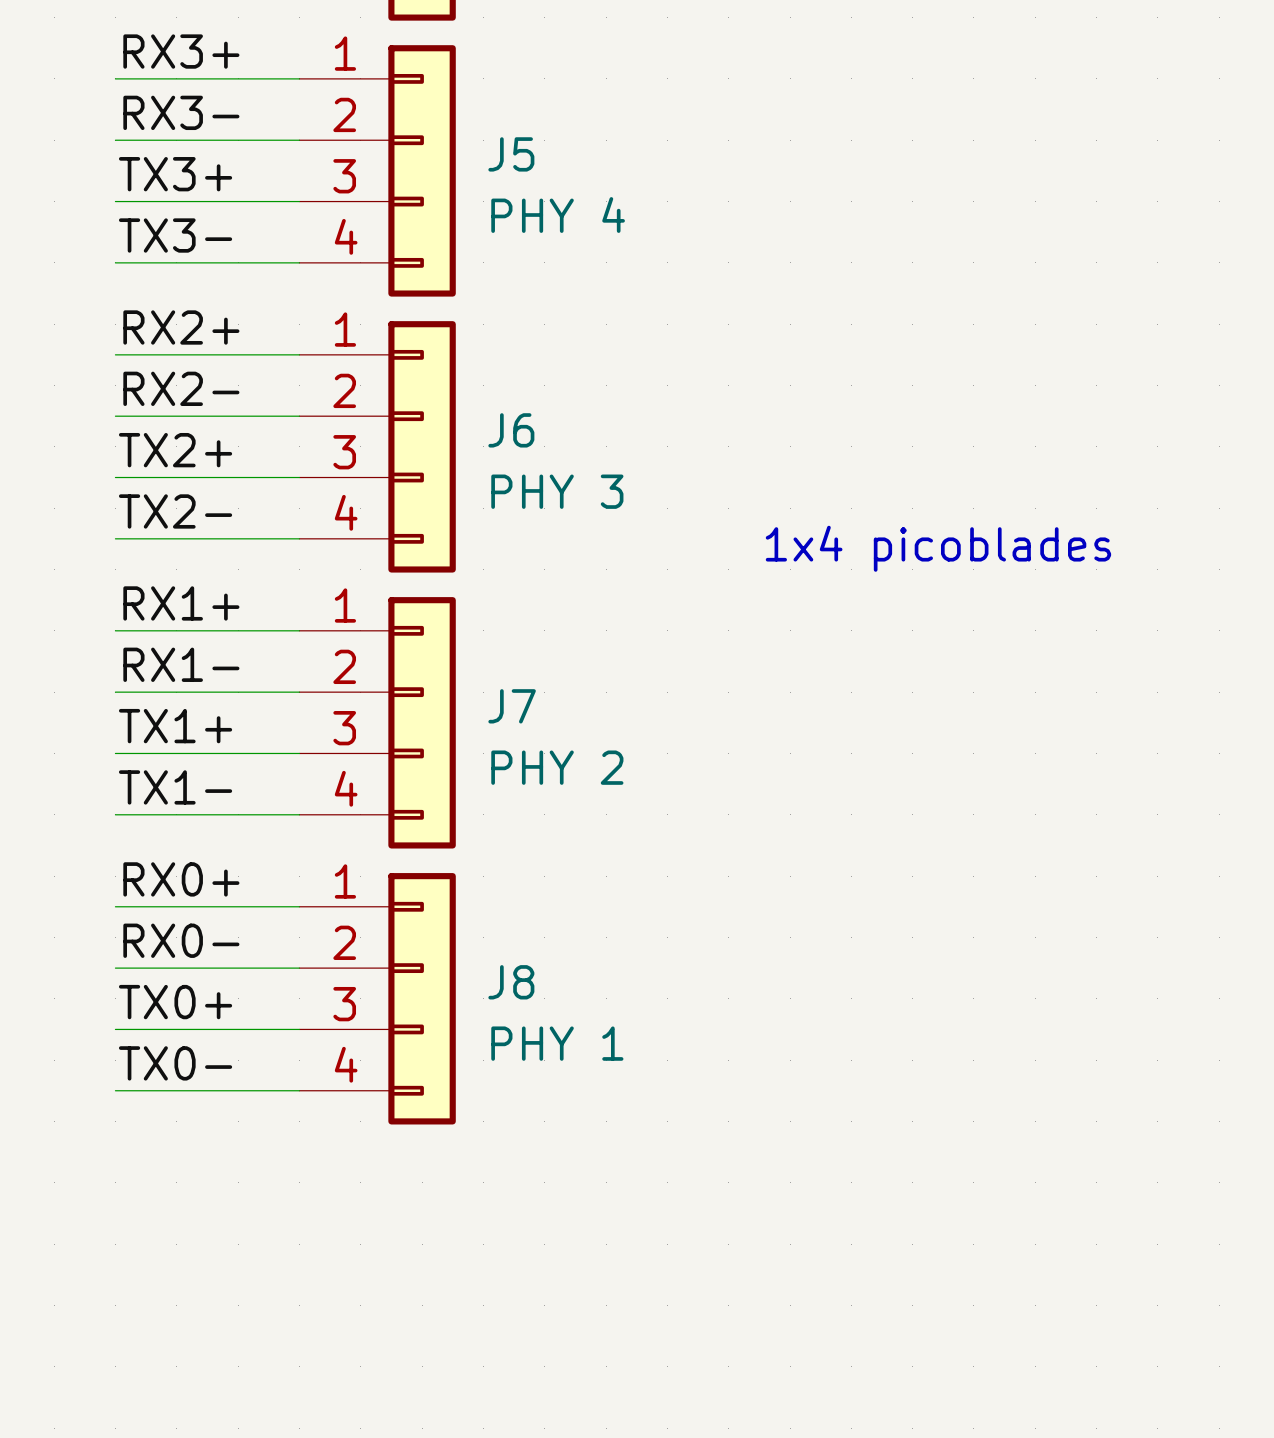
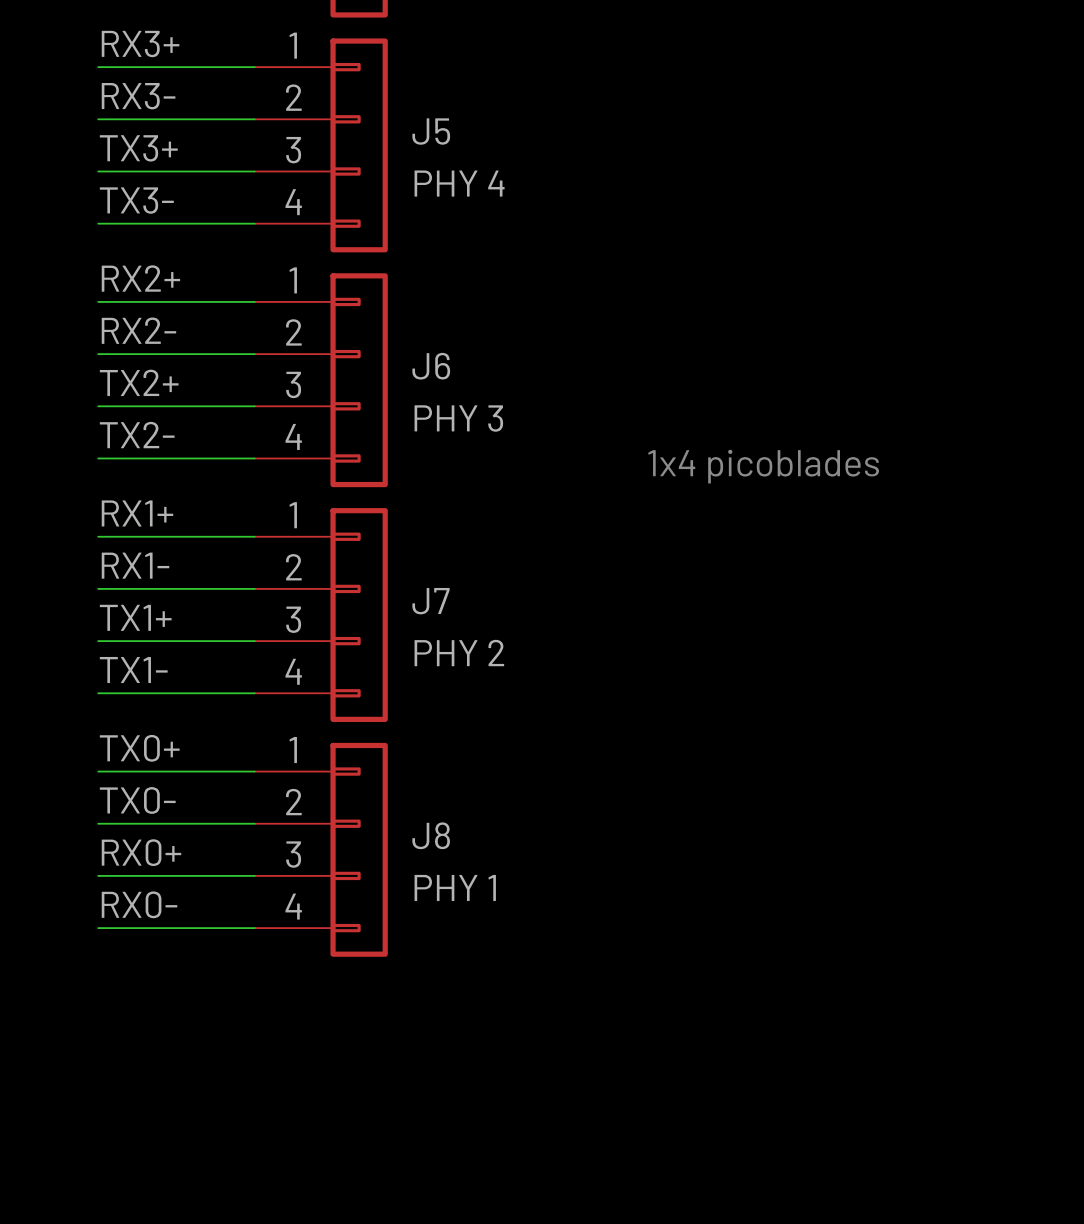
label: RX0+ (181, 879) -> TX0+ (139, 748)
label: RX0- (181, 940) -> TX0- (137, 800)
label: TX0+ (175, 1002) -> RX0+ (141, 852)
label: TX0- (175, 1063) -> RX0- (139, 904)

